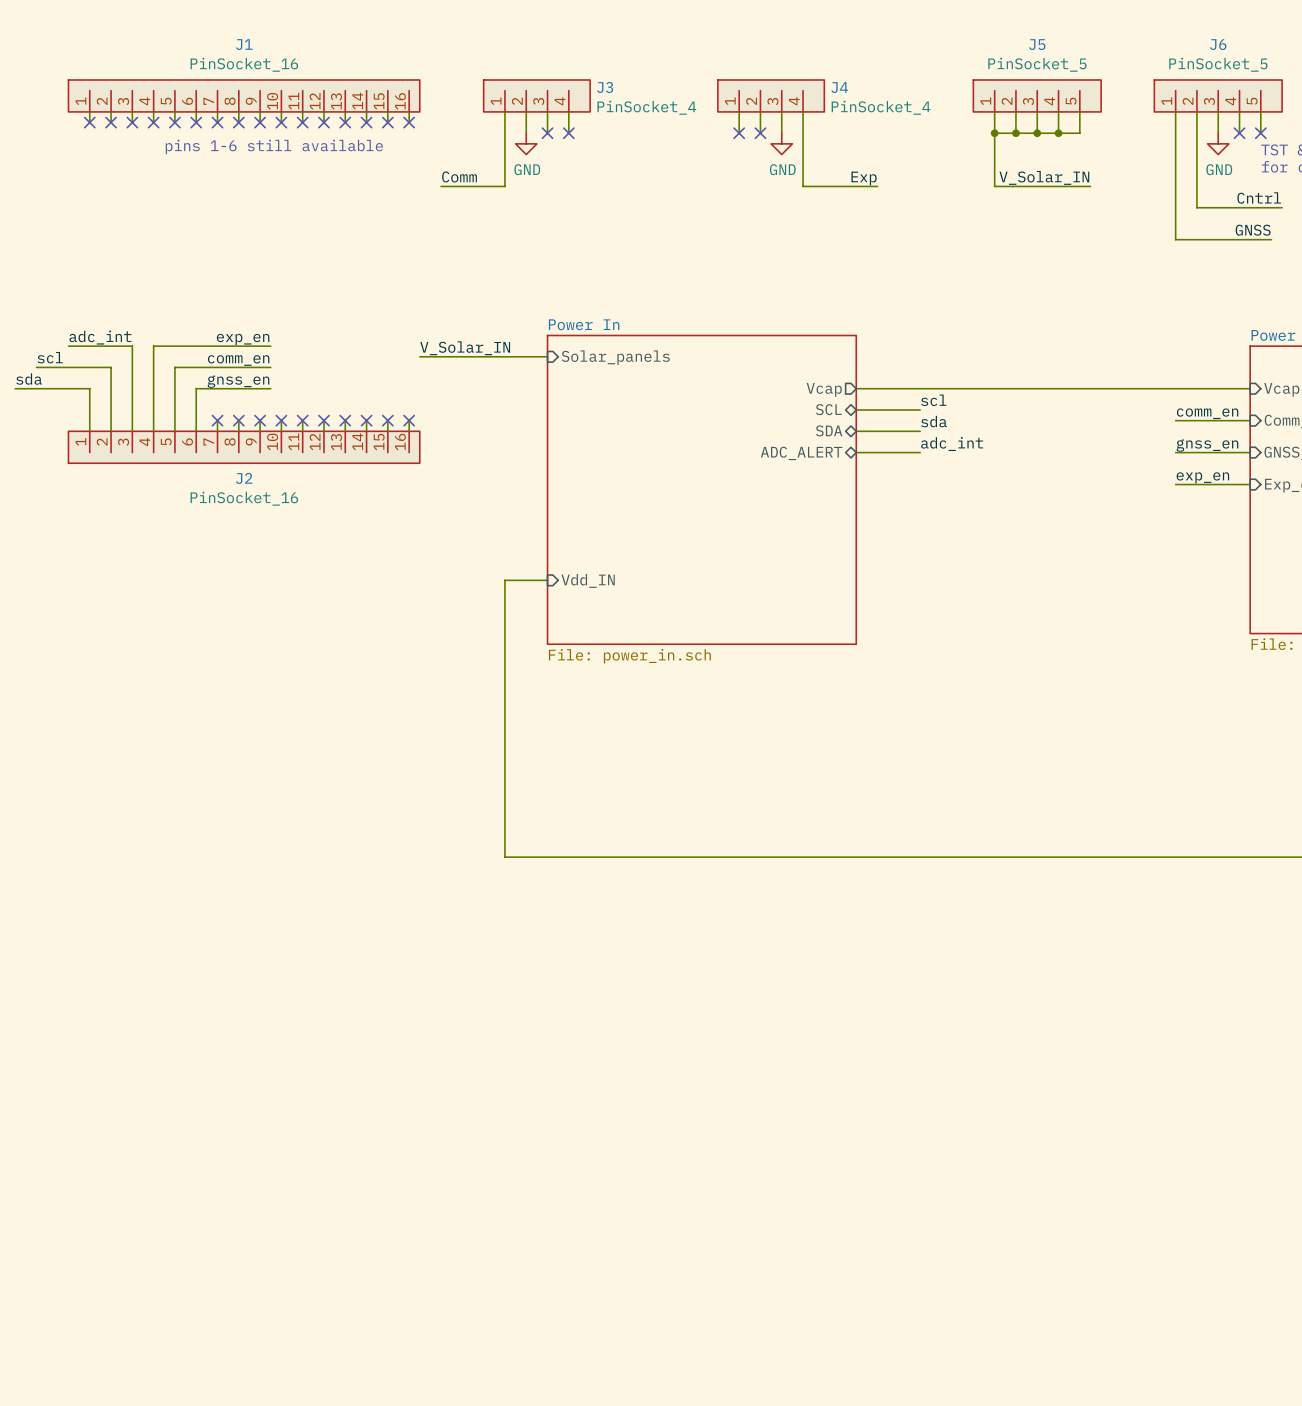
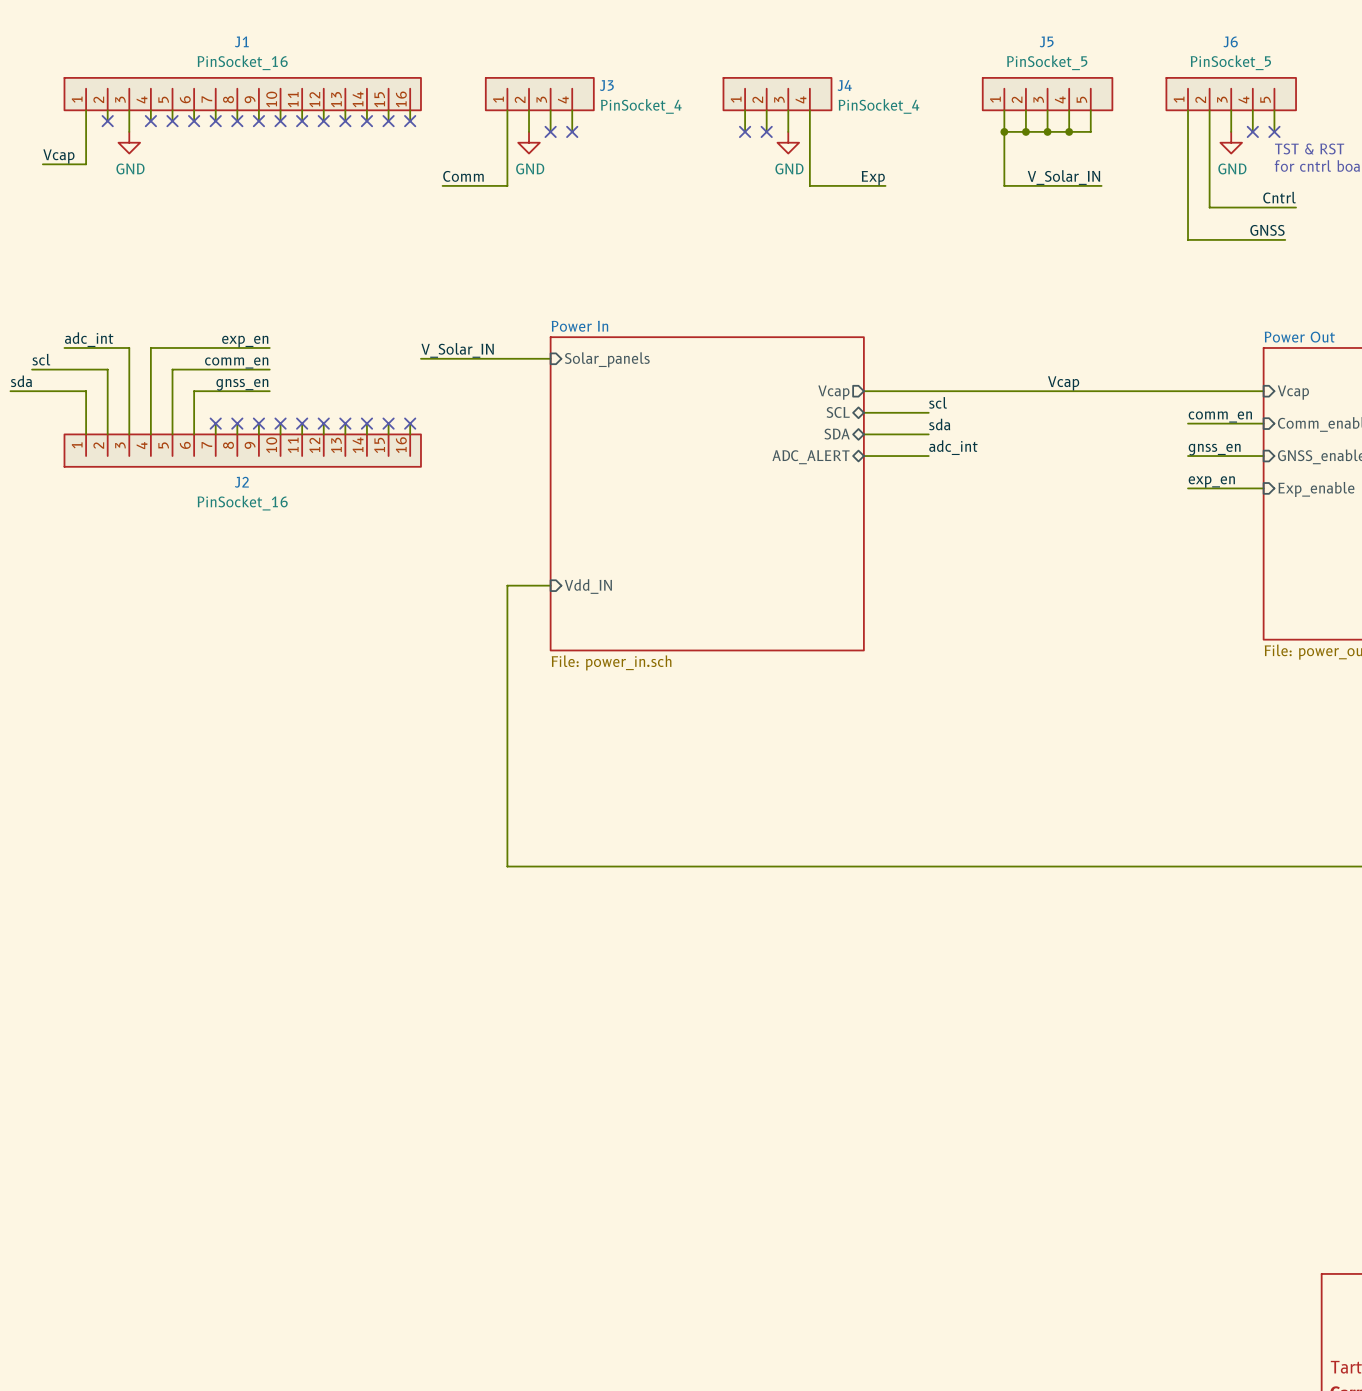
wire: none -> (86, 121) (86, 164) (42, 164)
no-connect mark: (89, 122) -> none
wire: none -> (129, 121) (129, 131)
no-connect mark: (132, 122) -> none
power symbol: none -> GND (129, 142)
text: pins 1-6 still available (274, 146) -> none
label: none -> Vcap (58, 156)
label: none -> Vcap (1063, 383)

